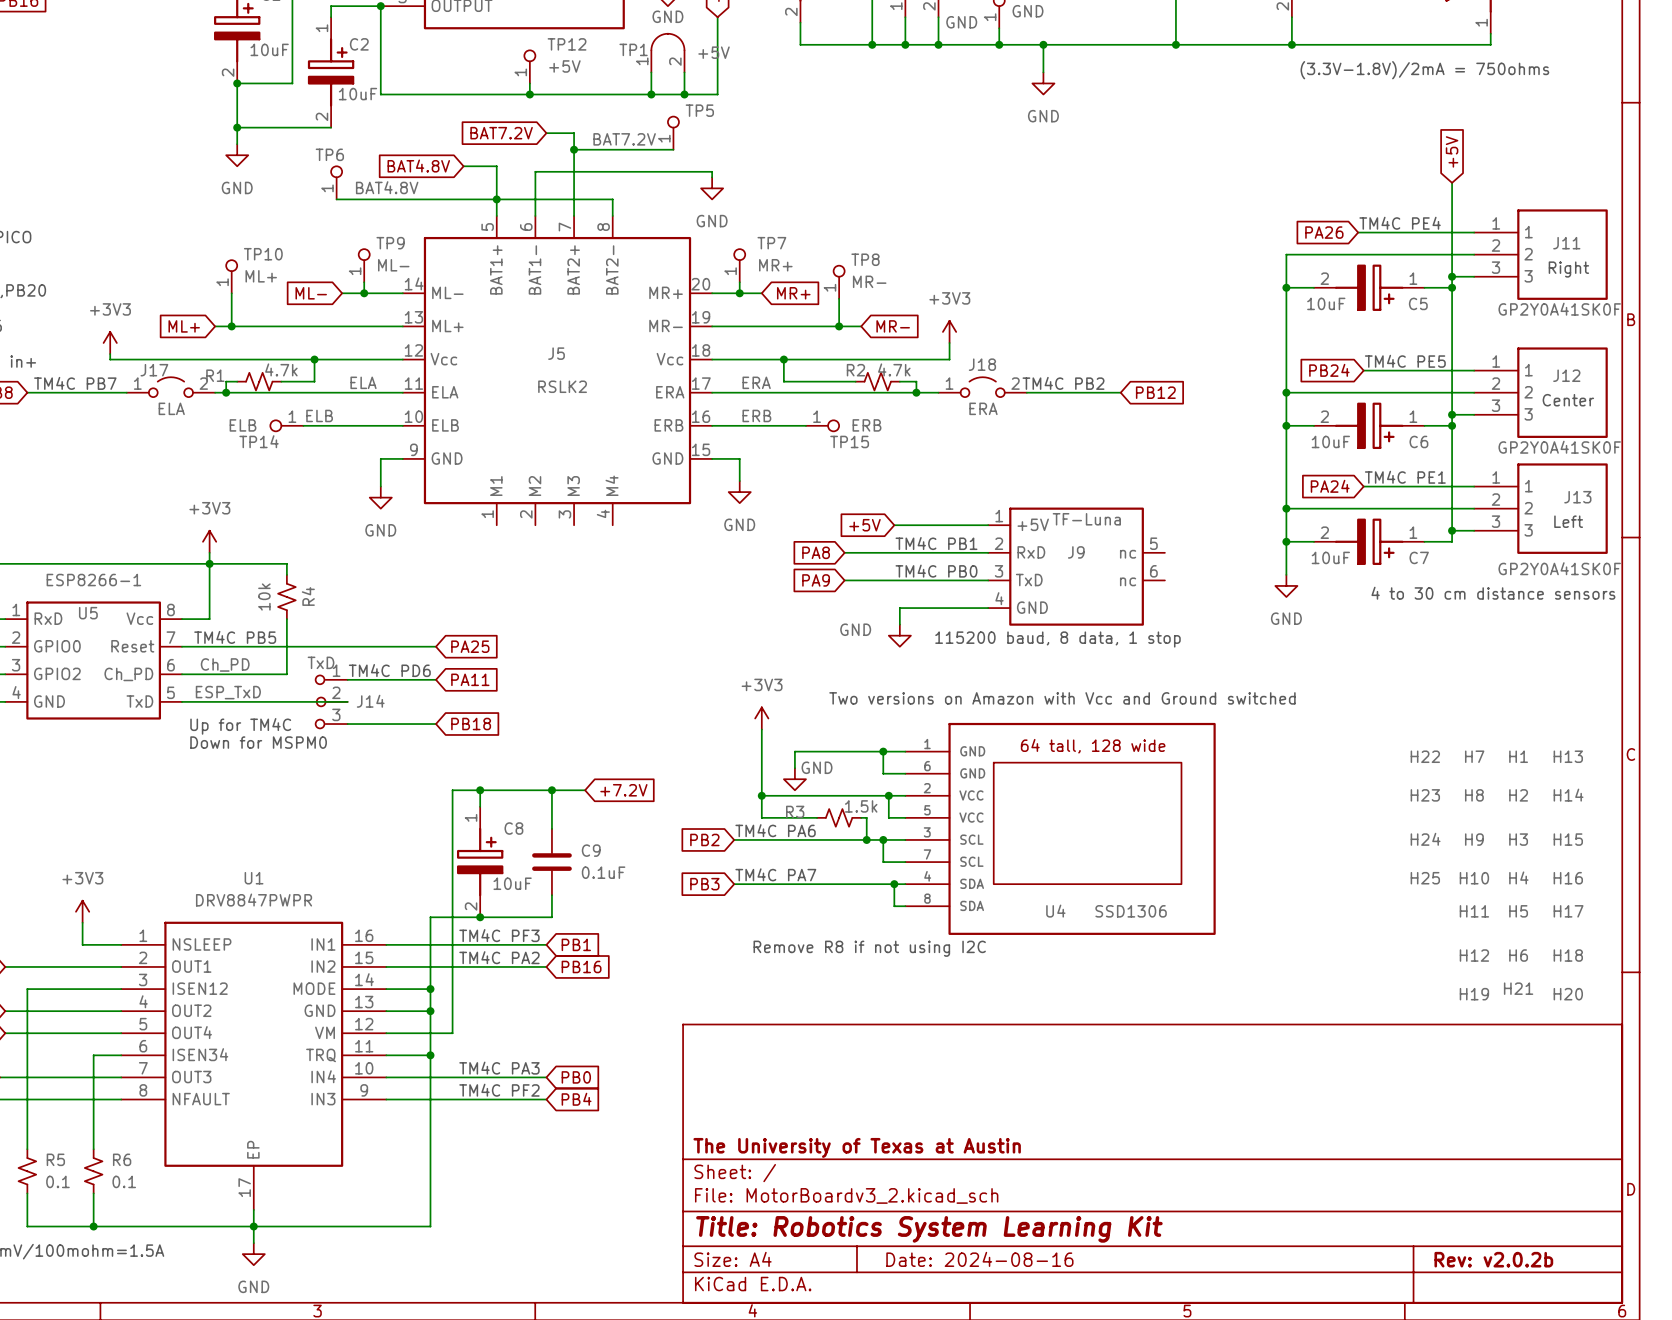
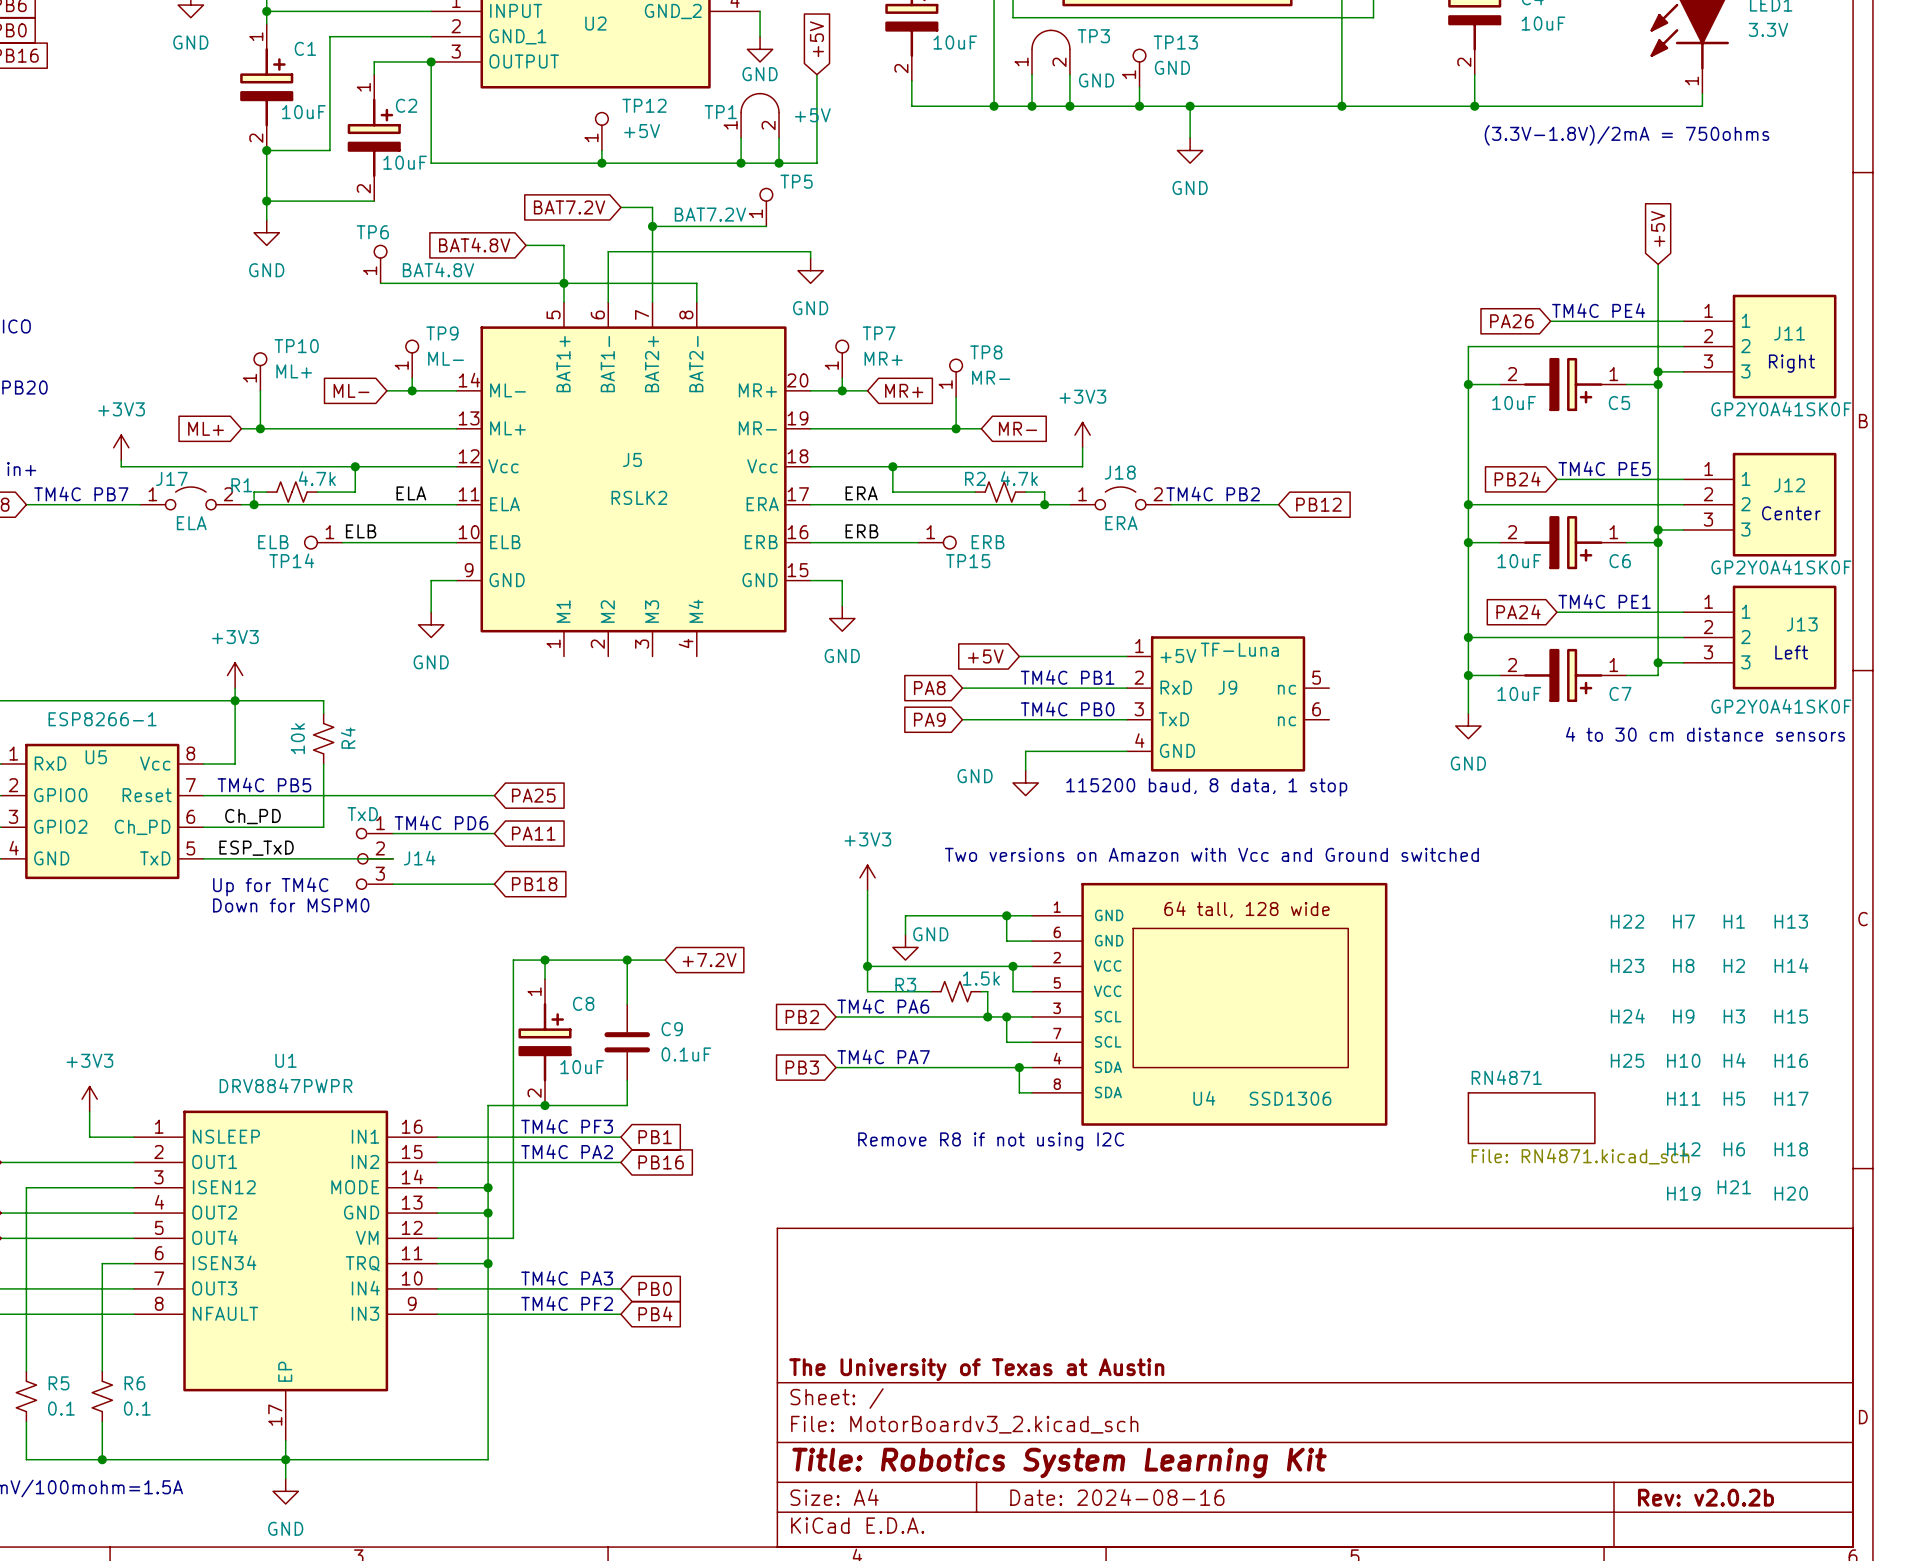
sheet RN4871: none -> File: RN4871.kicad_sch (1531, 1118)

